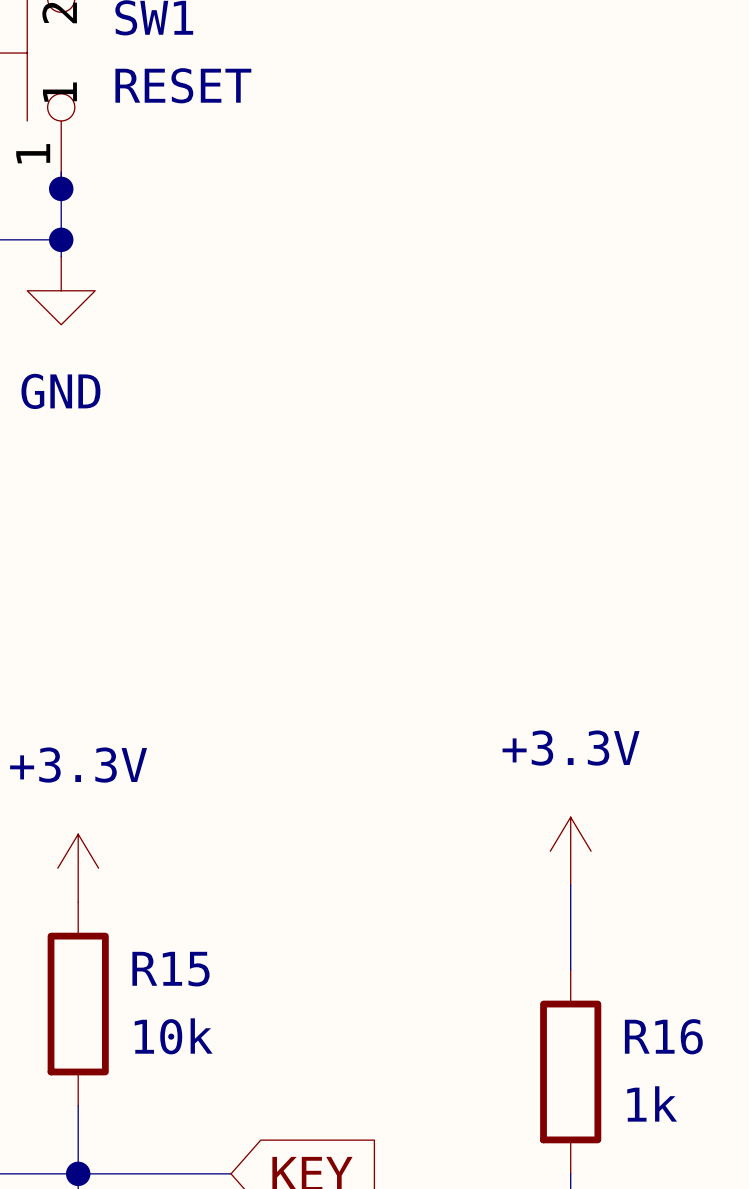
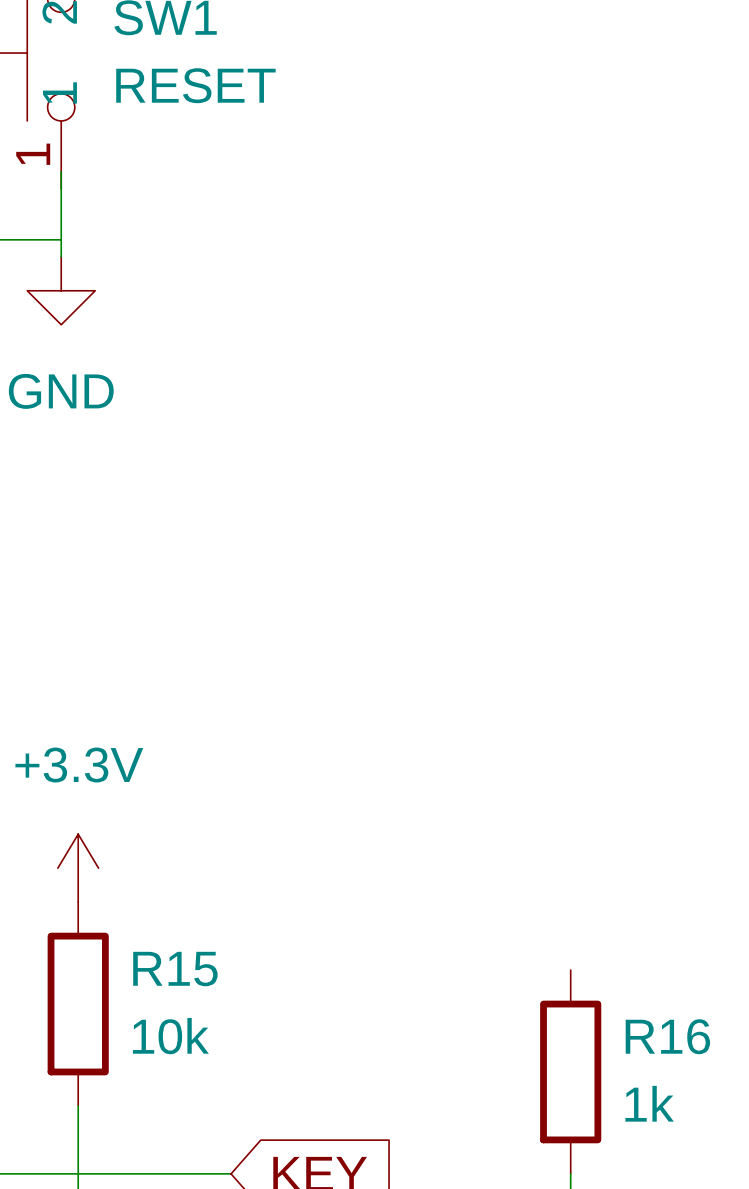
junction: (61, 188) -> none
junction: (61, 239) -> none
power symbol: +3.3V (570, 851) -> none
wire: (570, 885) (570, 970) -> none
junction: (78, 1173) -> none

